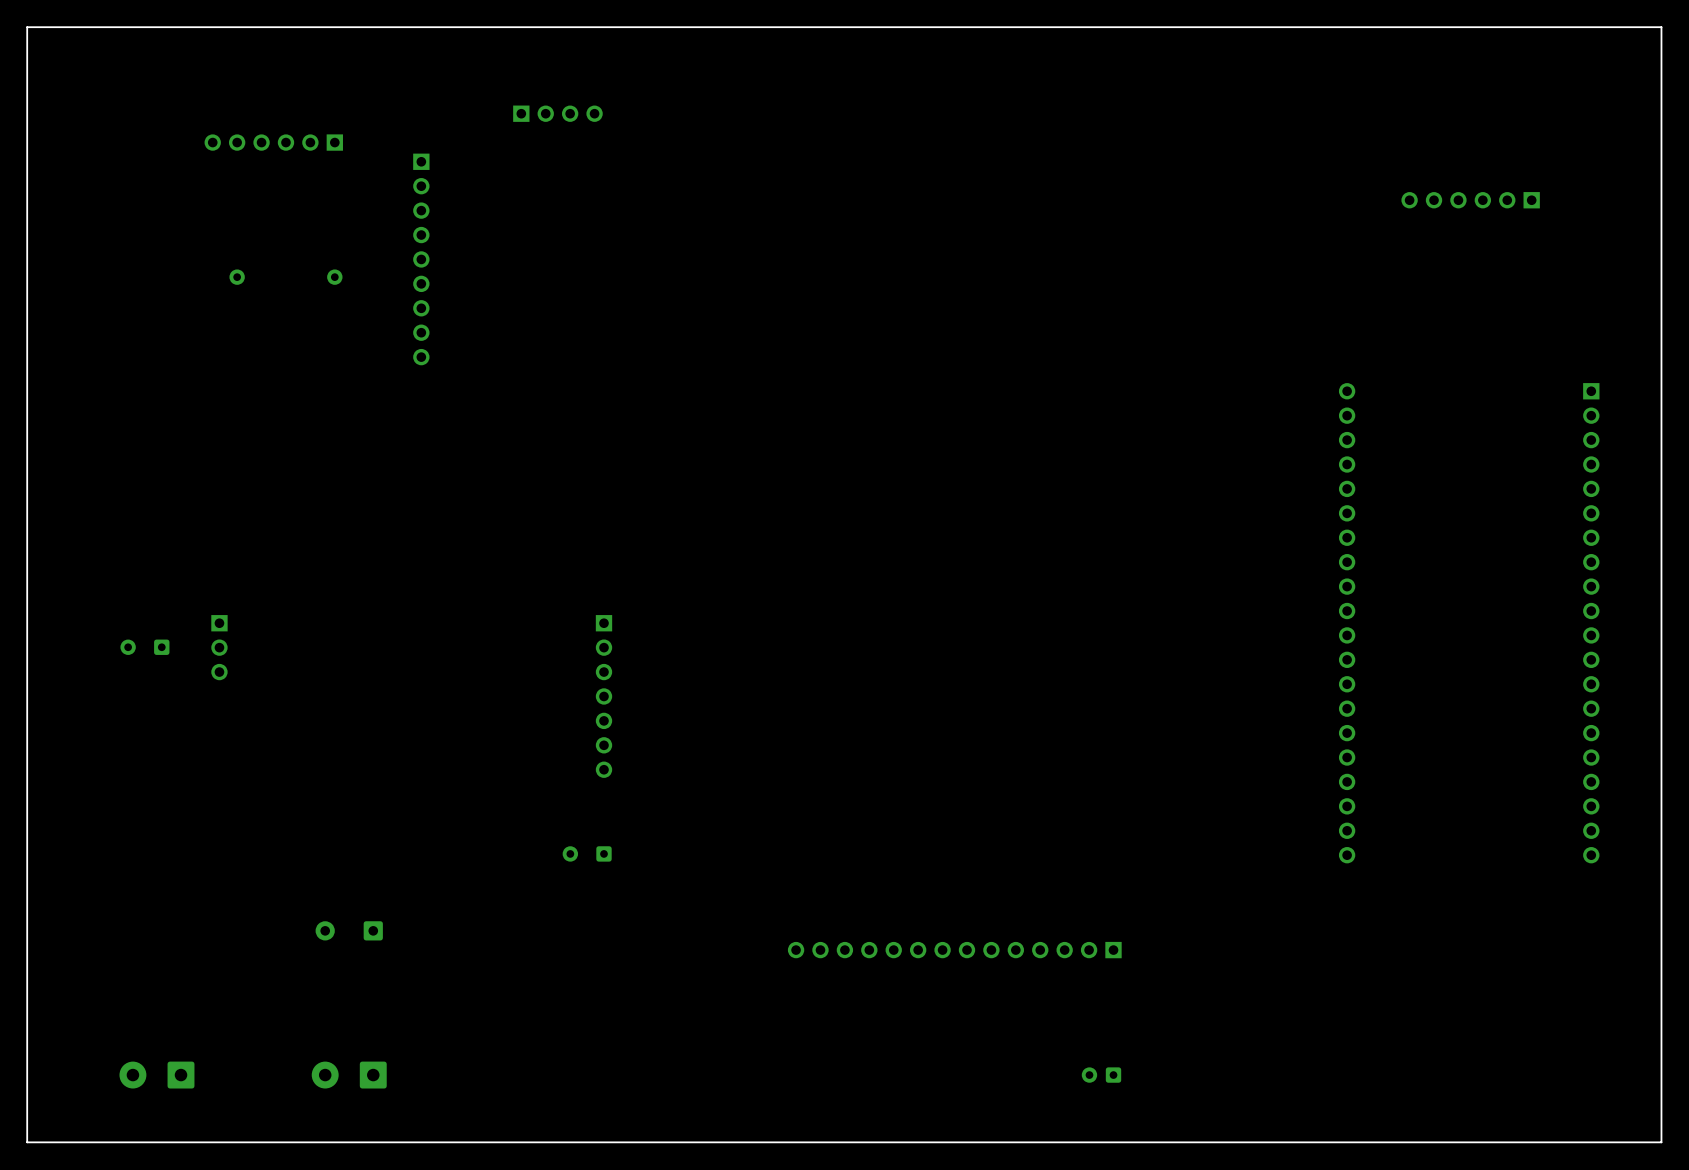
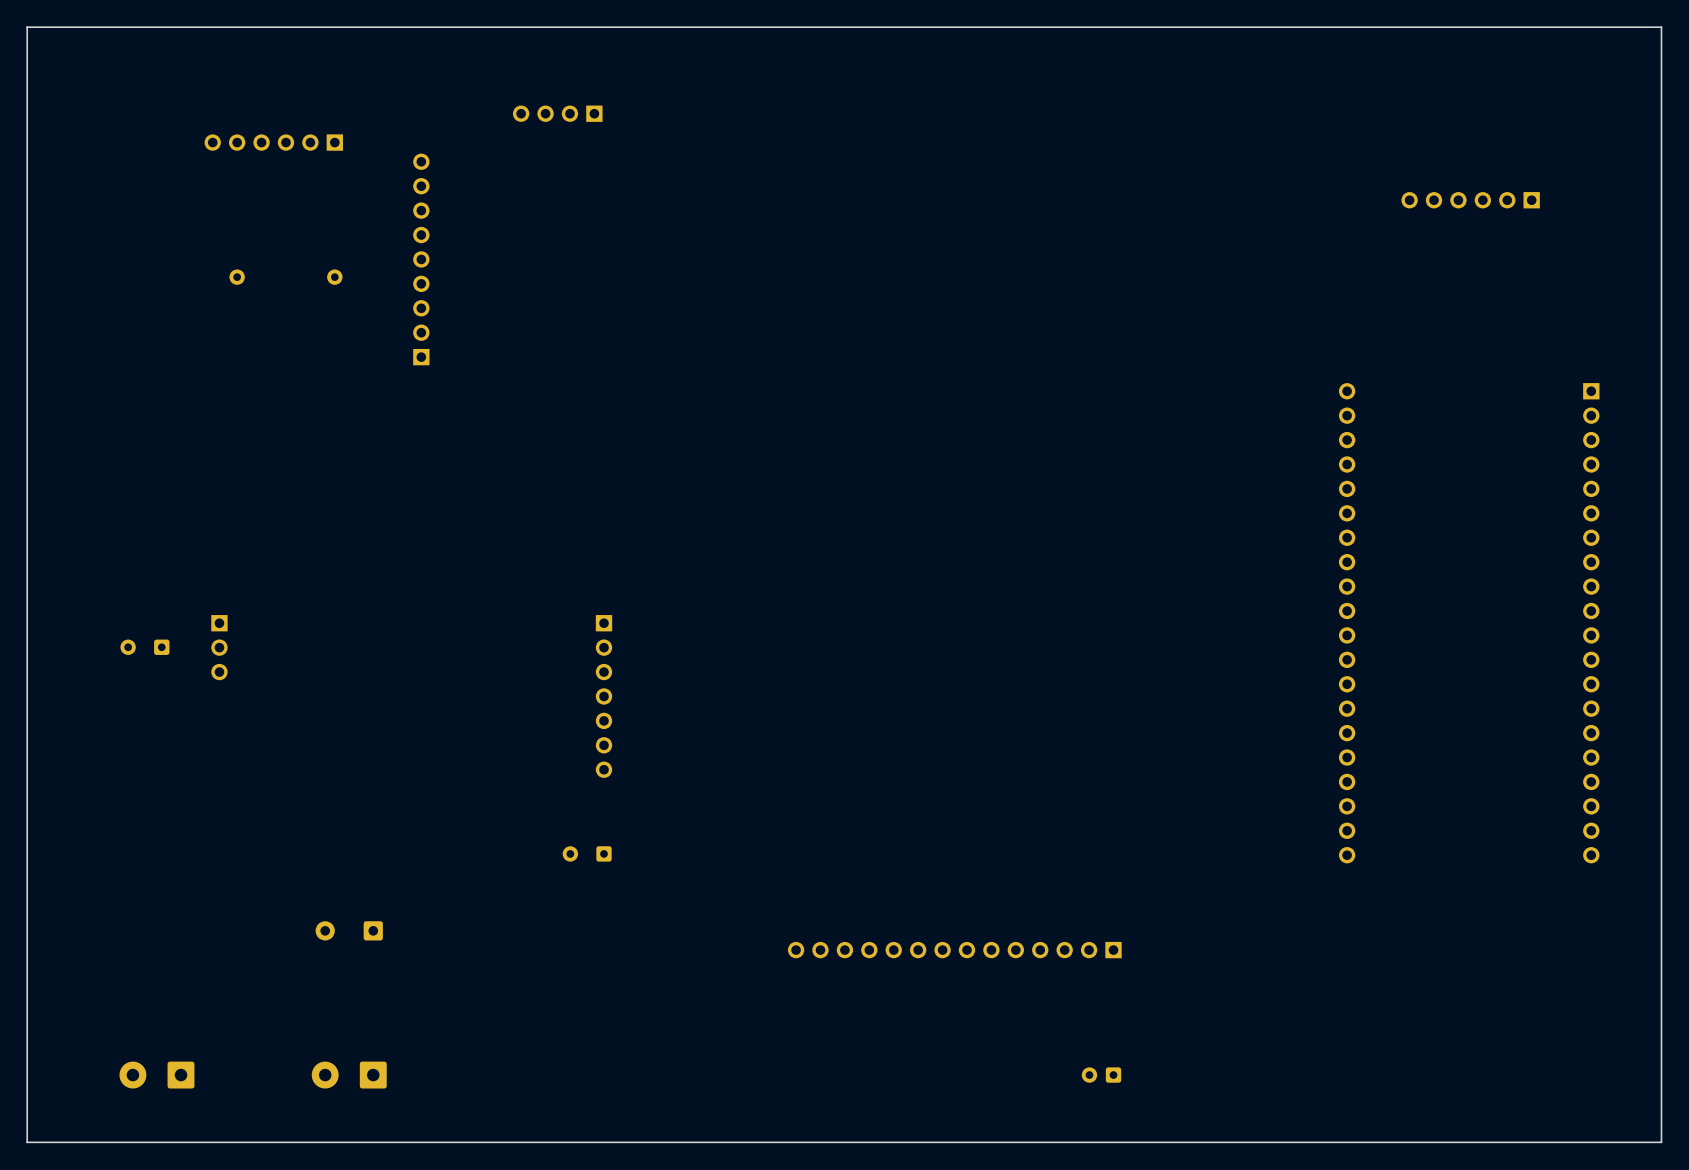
part rotation: 0° (557, 113) -> 180° (557, 113)
part rotation: 0° (421, 259) -> 180° (421, 259)

